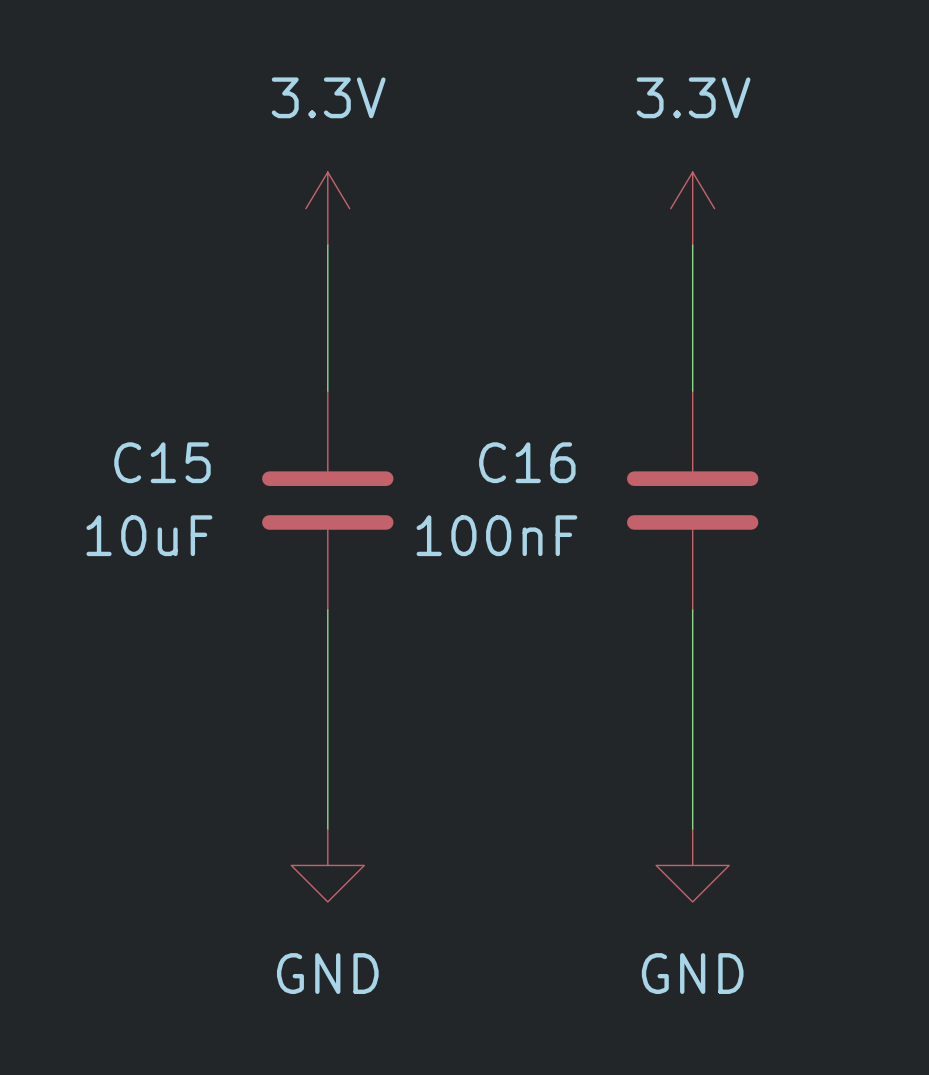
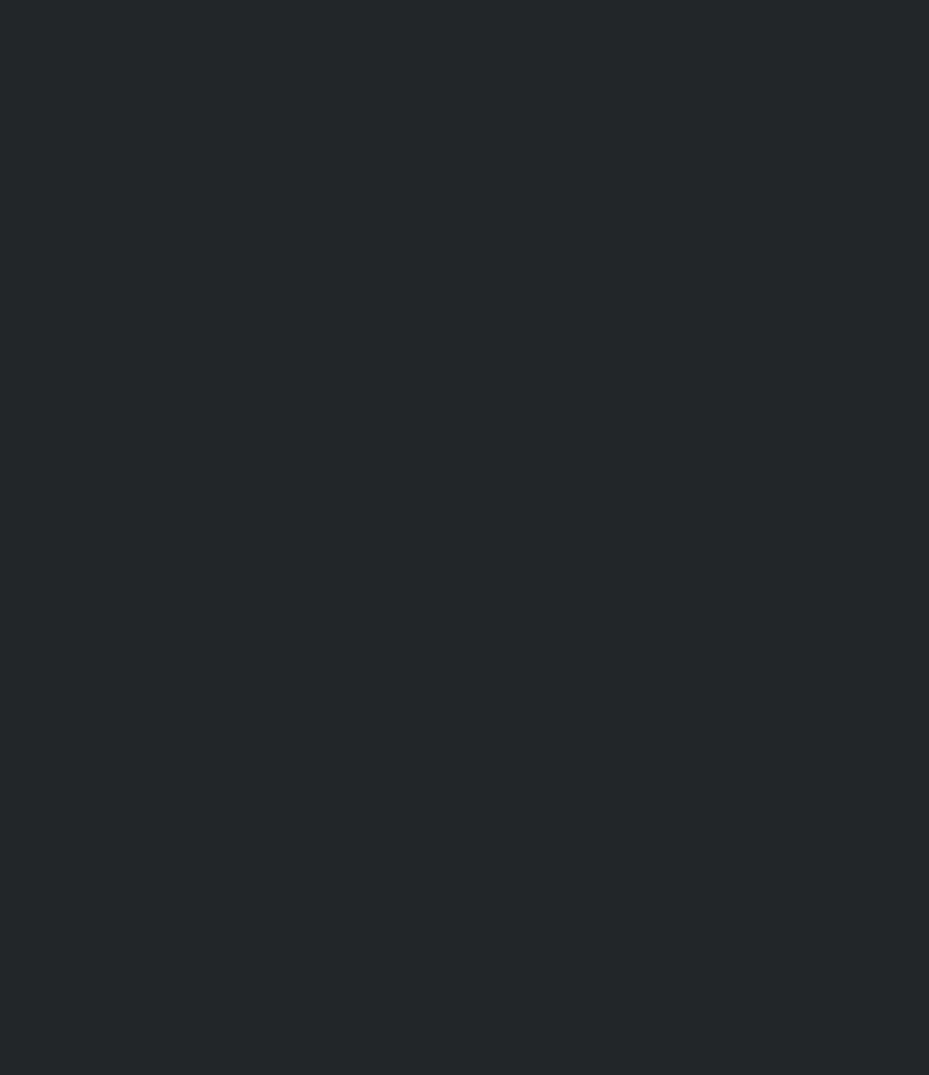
power symbol: 3.3V (327, 208) -> none
power symbol: 3.3V (692, 208) -> none
wire: (327, 245) (327, 391) -> none
wire: (692, 245) (692, 391) -> none
C15: 10uF (327, 500) -> none
C16: 100nF (692, 500) -> none
wire: (327, 610) (327, 828) -> none
wire: (692, 610) (692, 828) -> none
power symbol: GND (327, 865) -> none
power symbol: GND (692, 865) -> none

